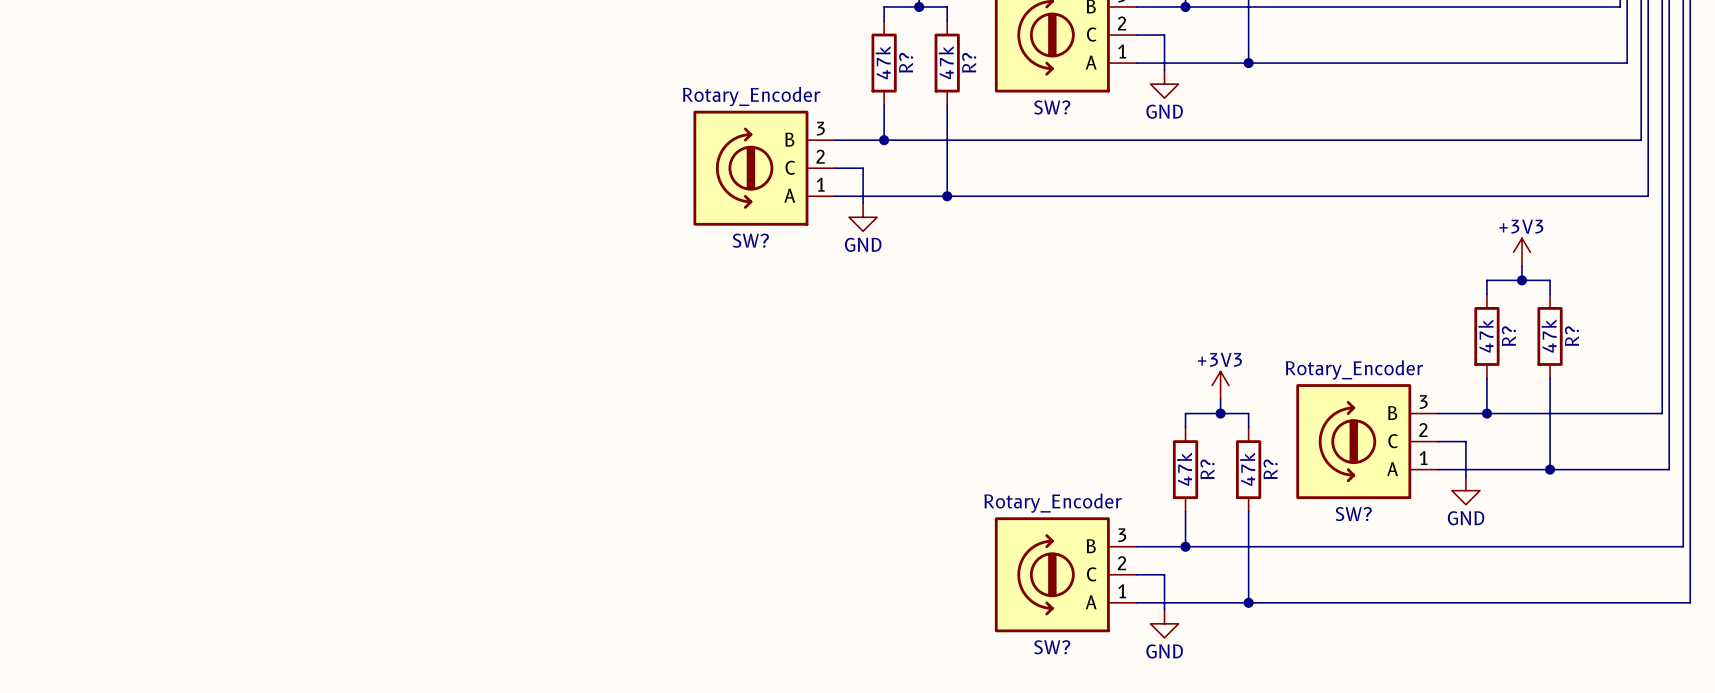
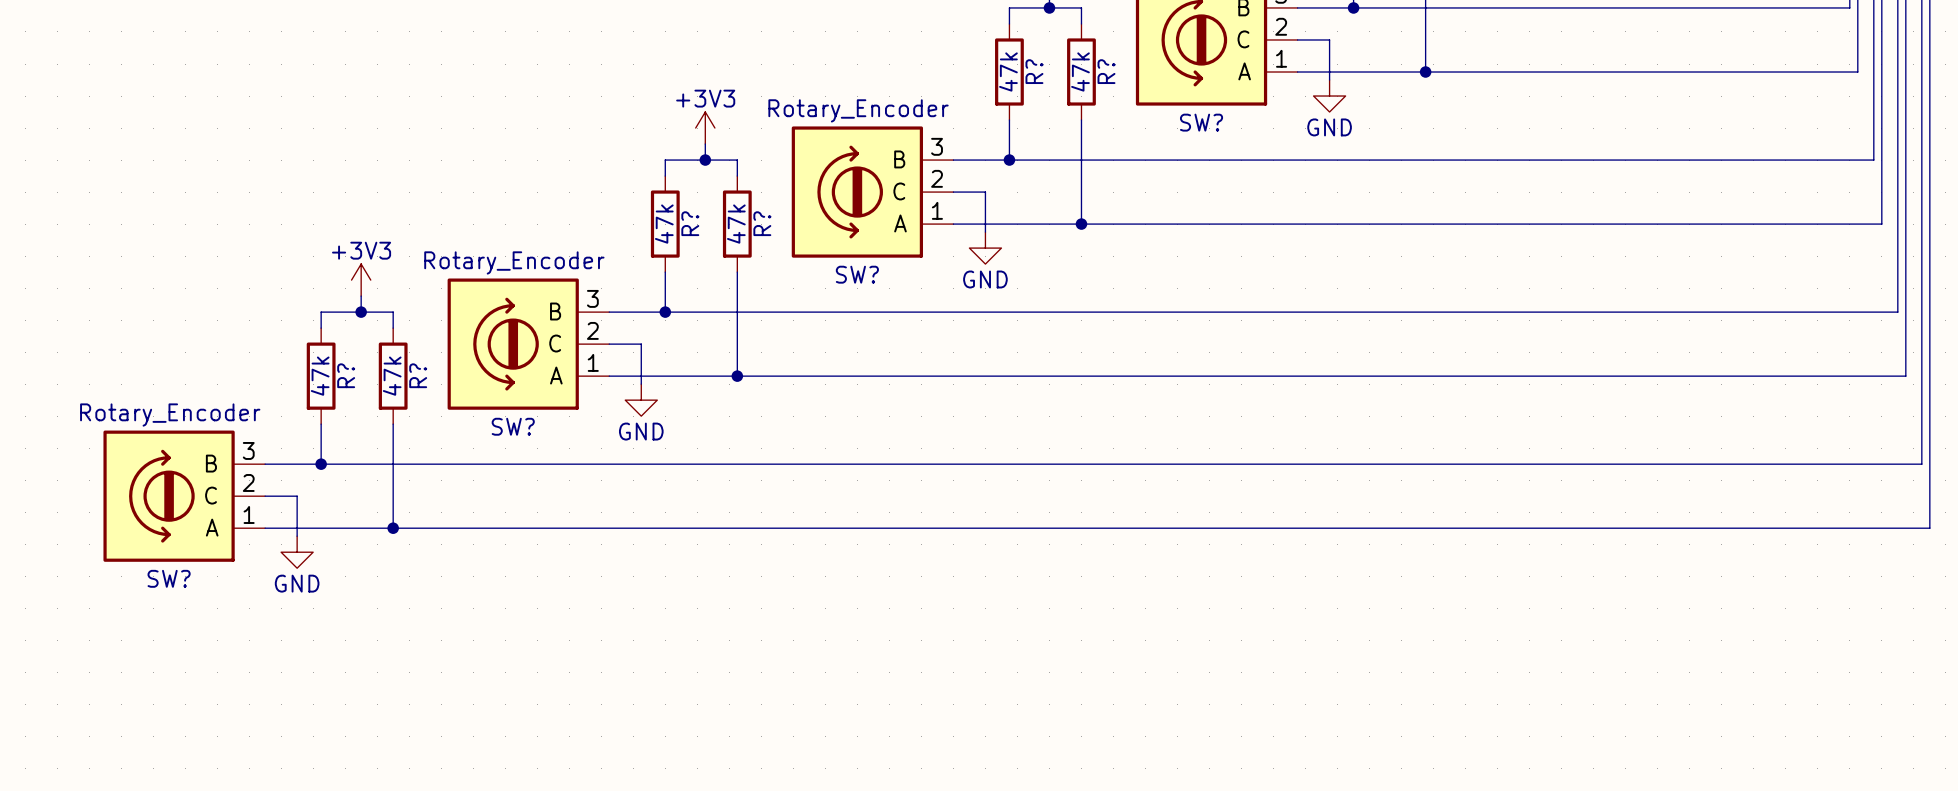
power symbol: none -> +3V3 (705, 128)
wire: none -> (705, 144) (705, 160)
junction: none -> (705, 160)
wire: none -> (665, 176) (665, 160) (737, 160) (737, 176)
R?: none -> 47k (665, 224)
R?: none -> 47k (737, 224)
wire: none -> (665, 272) (665, 312)
wire: none -> (737, 272) (737, 376)
power symbol: none -> +3V3 (361, 280)
power symbol: +3V3 (1522, 252) -> none
wire: none -> (361, 296) (361, 312)
wire: (1522, 266) (1522, 280) -> none
junction: none -> (361, 312)
junction: none -> (665, 312)
wire: (1662, 273) (1662, 413) (1437, 413) -> (1897, 312) (609, 312)
junction: (1522, 280) -> none
wire: none -> (321, 328) (321, 312) (393, 312) (393, 328)
wire: (1486, 294) (1486, 280) (1550, 280) (1550, 294) -> none
SW?: none -> Rotary_Encoder (528, 344)
wire: none -> (609, 344) (641, 344) (641, 384)
R?: none -> 47k (321, 376)
R?: none -> 47k (393, 376)
junction: none -> (737, 376)
wire: (1669, 329) (1669, 469) (1437, 469) -> (1905, 376) (609, 376)
R?: 47k (1486, 336) -> none
R?: 47k (1550, 336) -> none
power symbol: none -> GND (641, 400)
wire: none -> (321, 424) (321, 464)
wire: none -> (393, 424) (393, 528)
wire: (1486, 378) (1486, 413) -> none
wire: (1550, 378) (1550, 469) -> none
power symbol: +3V3 (1220, 385) -> none
wire: (1220, 399) (1220, 413) -> none
junction: none -> (321, 464)
wire: (1683, 406) (1683, 546) (1136, 546) -> (1921, 464) (265, 464)
junction: (1220, 413) -> none
junction: (1486, 413) -> none
wire: (1185, 427) (1185, 413) (1248, 413) (1248, 427) -> none
SW?: none -> Rotary_Encoder (184, 496)
wire: none -> (265, 496) (297, 496) (297, 536)
SW?: Rotary_Encoder (1367, 441) -> none
wire: (1437, 441) (1465, 441) (1465, 476) -> none
junction: none -> (393, 528)
wire: (1690, 462) (1690, 602) (1136, 602) -> (1929, 528) (265, 528)
R?: 47k (1185, 469) -> none
R?: 47k (1248, 469) -> none
junction: (1550, 469) -> none
power symbol: none -> GND (297, 552)
power symbol: GND (1465, 490) -> none
wire: (1185, 511) (1185, 546) -> none
wire: (1248, 511) (1248, 602) -> none
junction: (1185, 546) -> none
SW?: Rotary_Encoder (1065, 574) -> none
wire: (1136, 574) (1164, 574) (1164, 609) -> none
junction: (1248, 602) -> none
power symbol: GND (1164, 623) -> none

